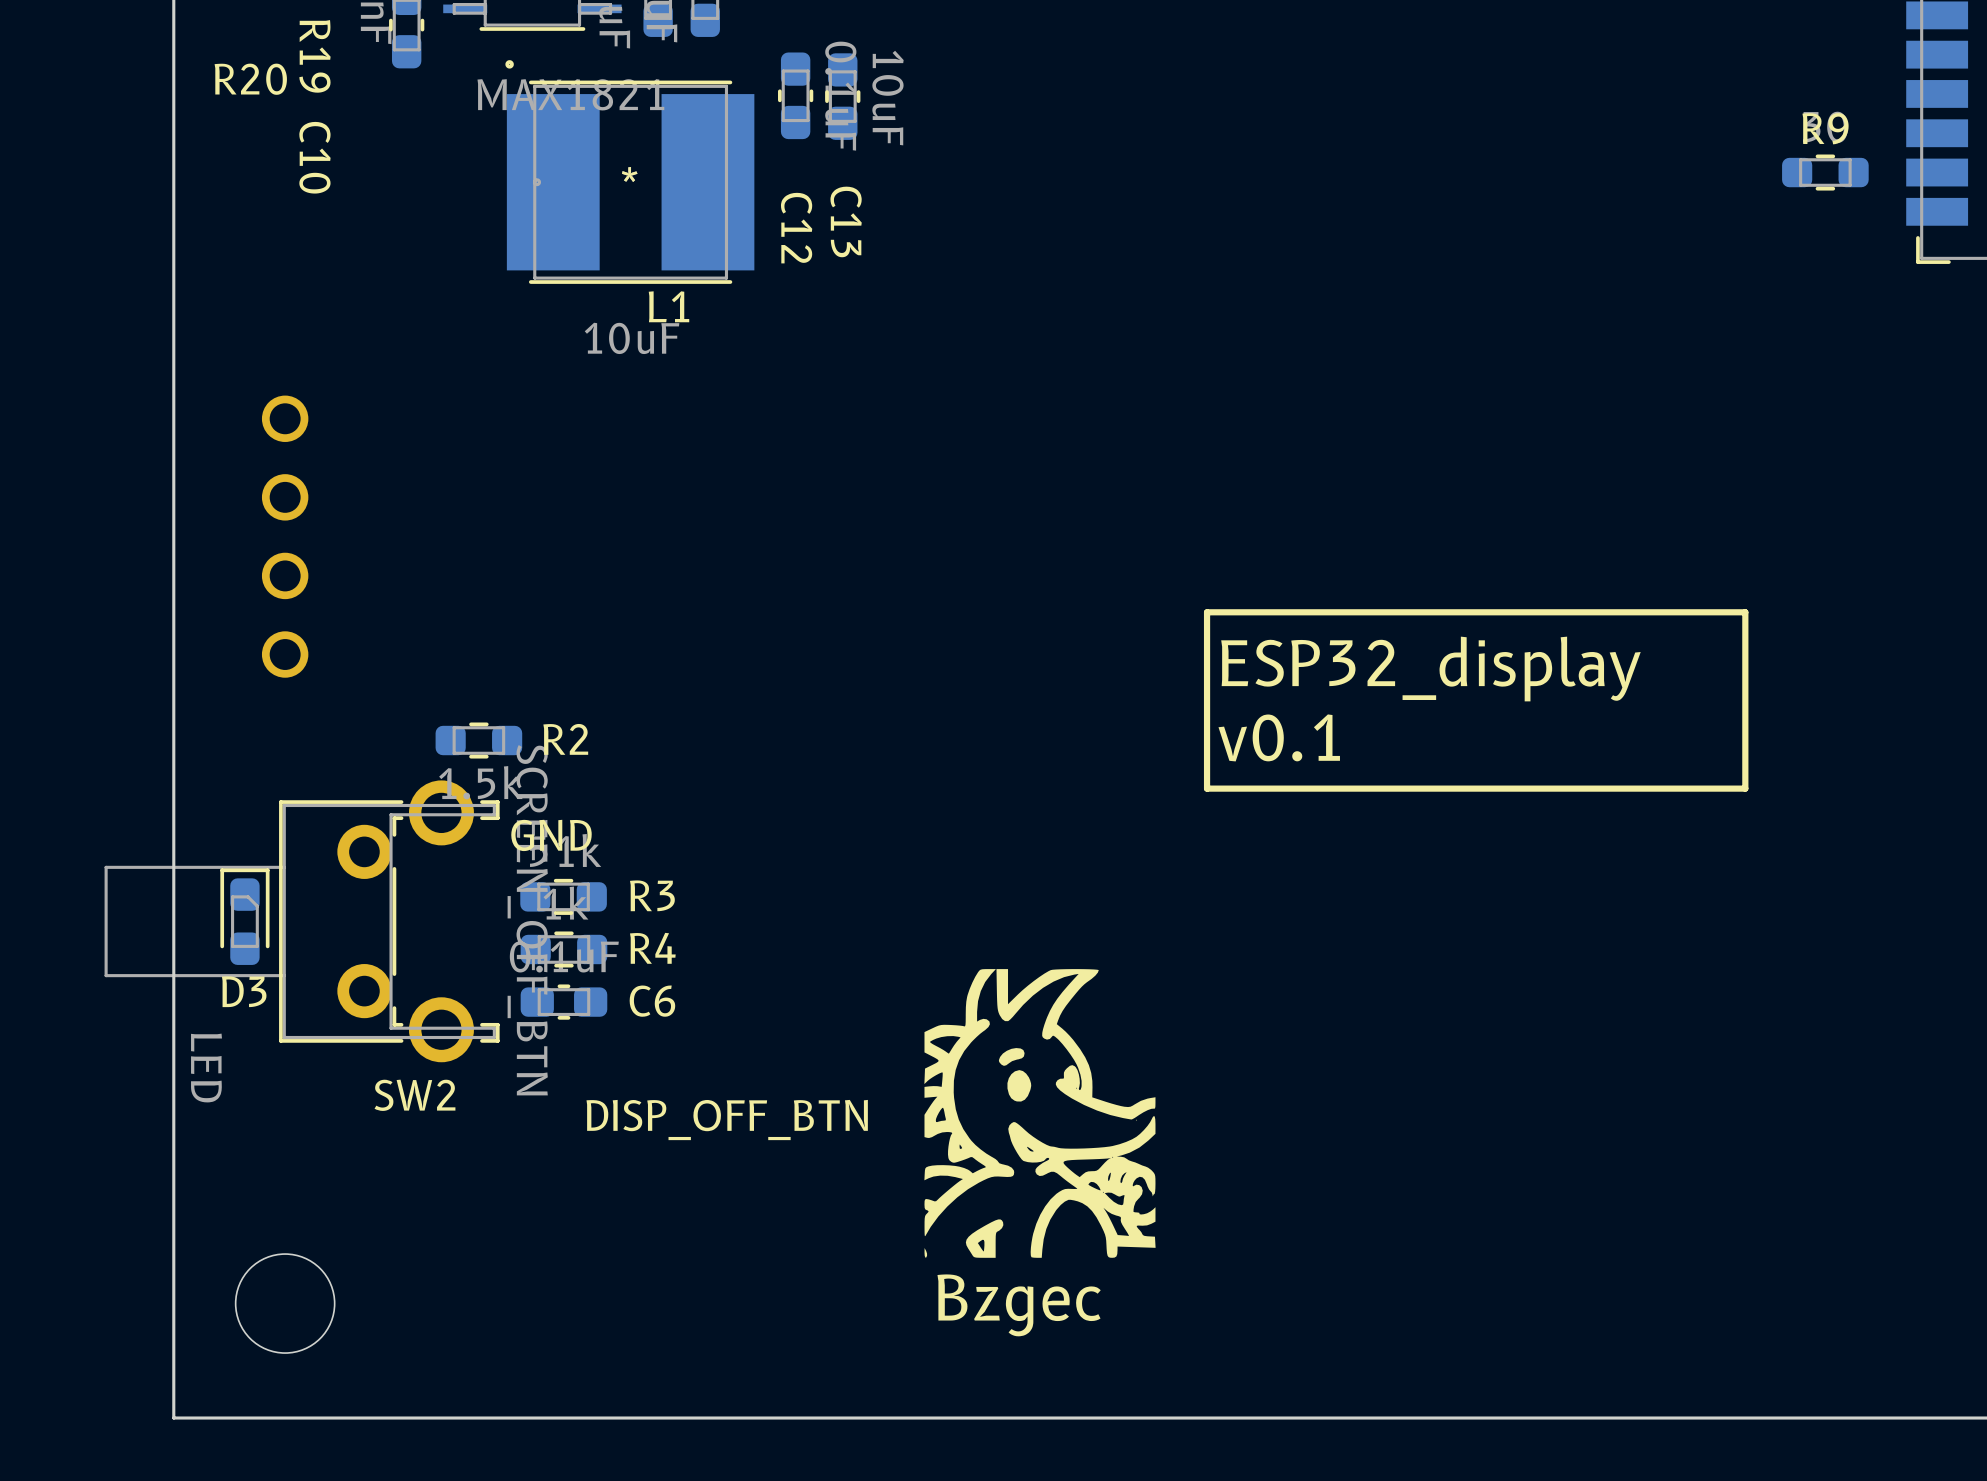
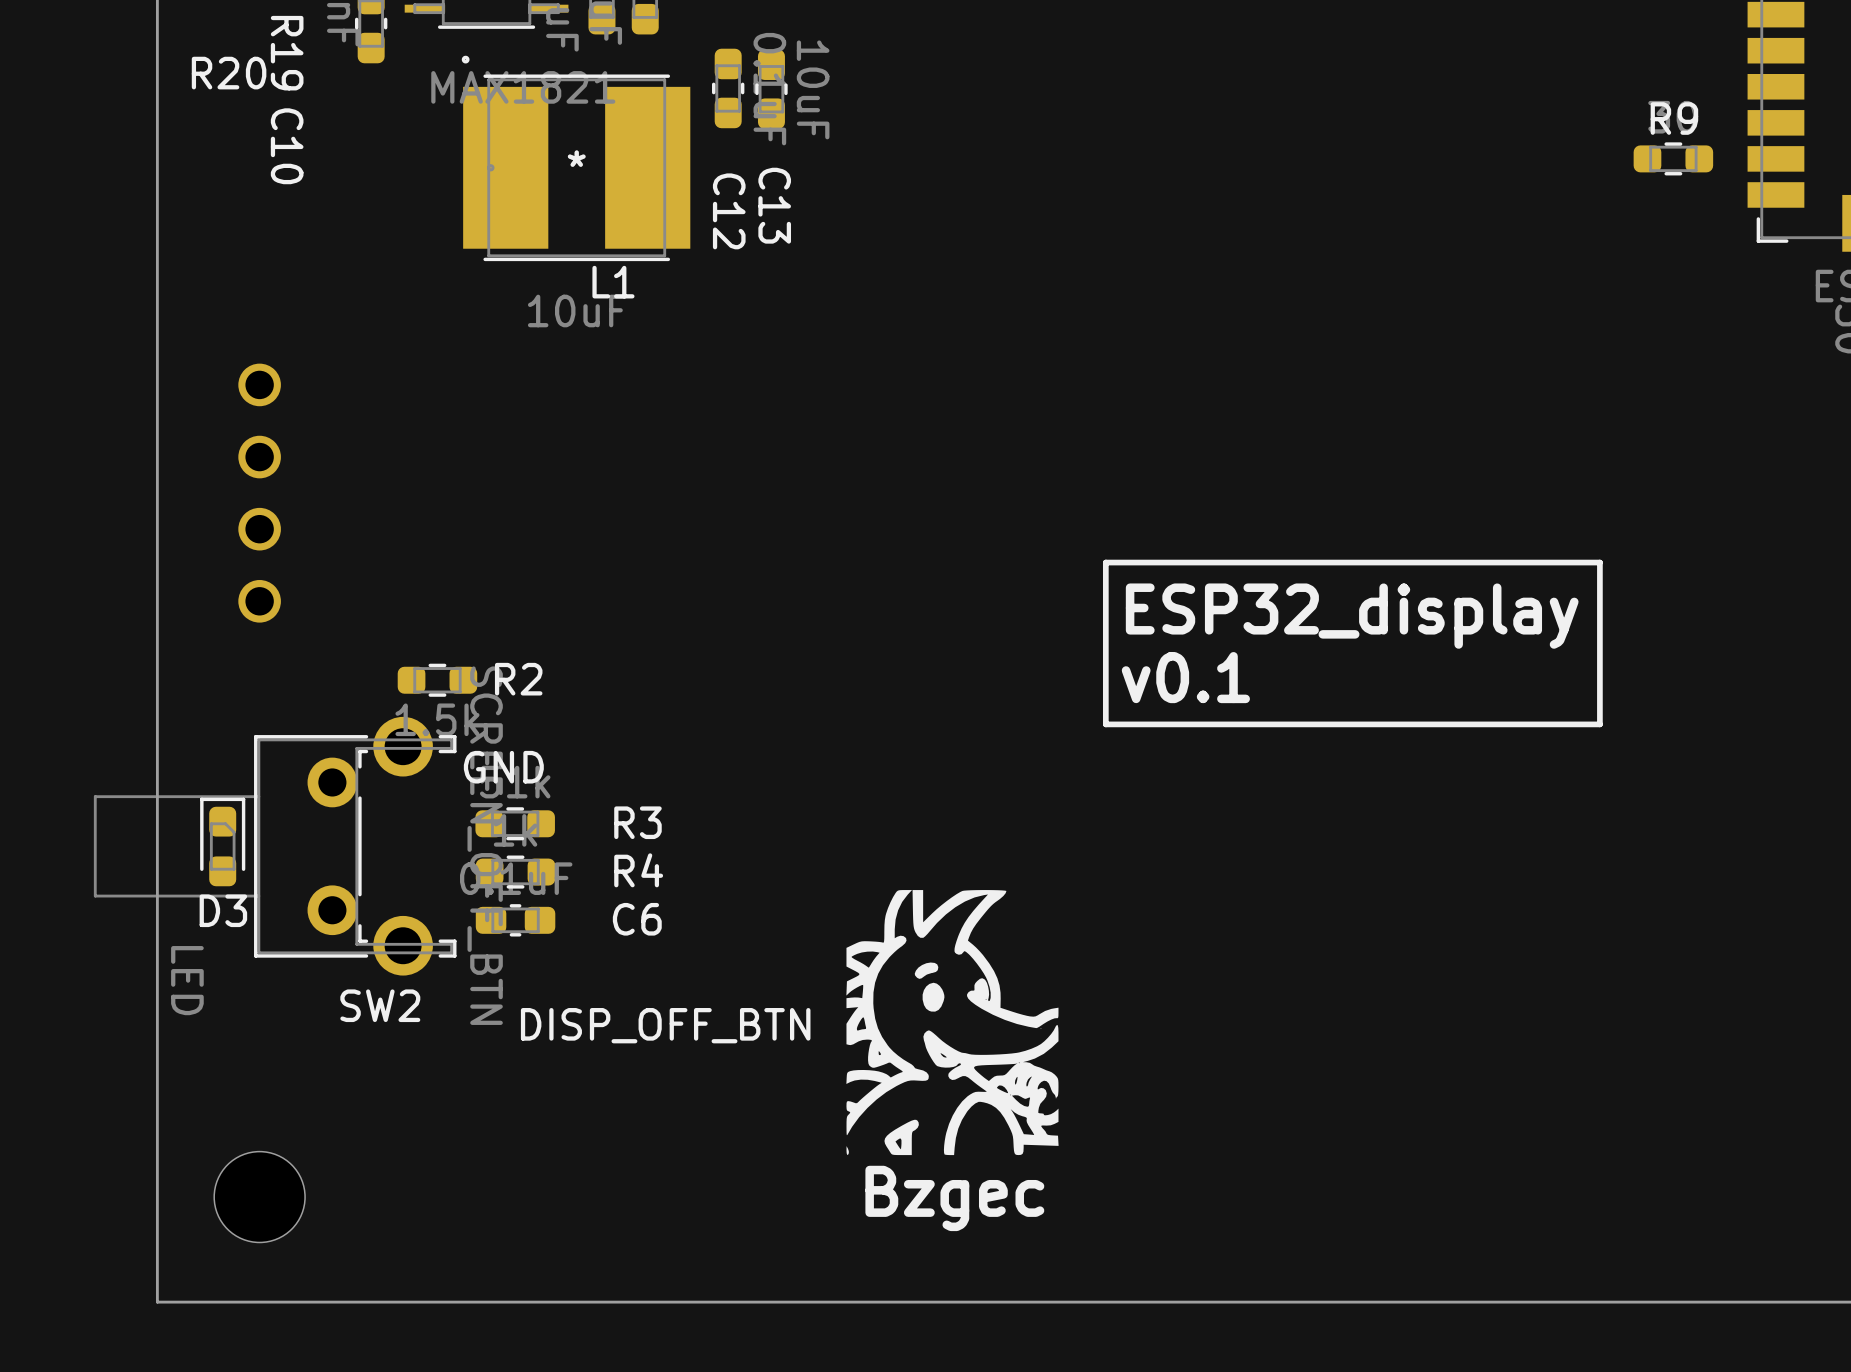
R3 name position: R3 (652, 895) -> R3 (637, 822)
R4 name position: R4 (652, 948) -> R4 (638, 870)
C6 name position: C6 (652, 1001) -> C6 (637, 919)

